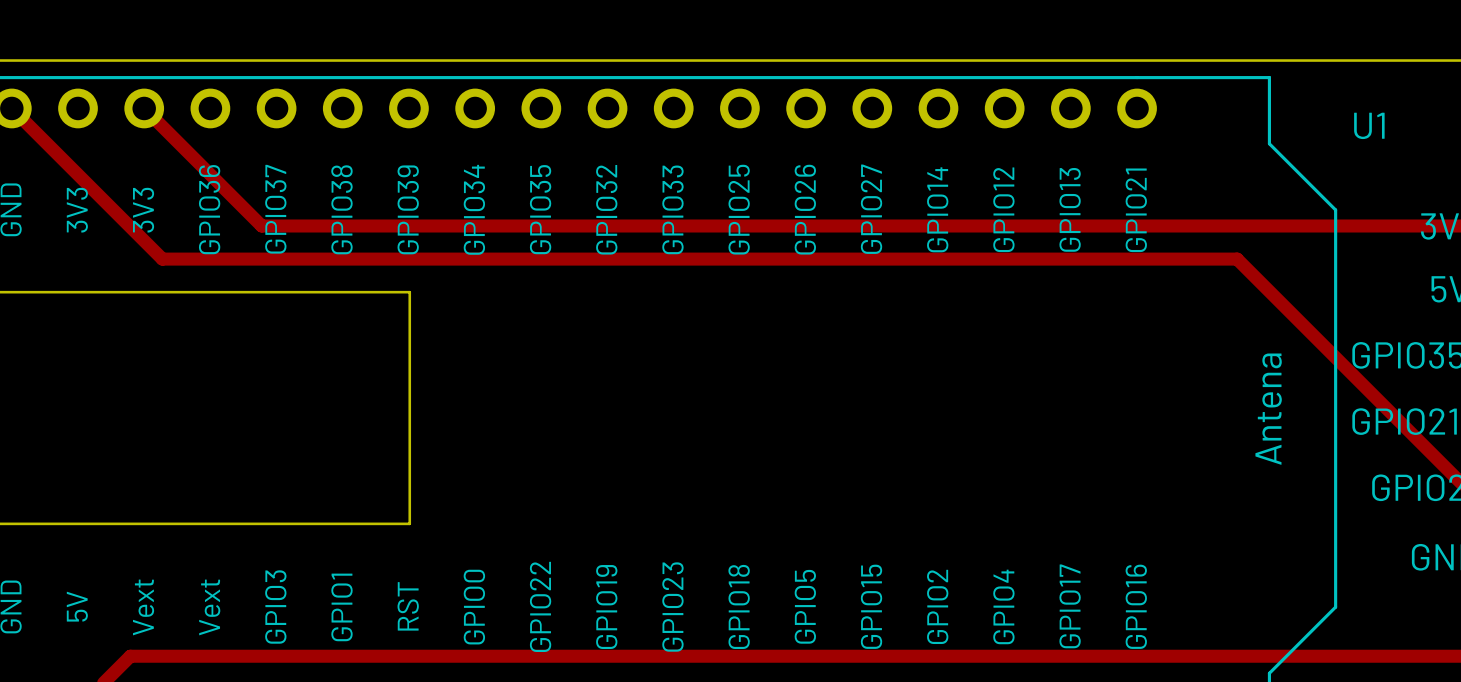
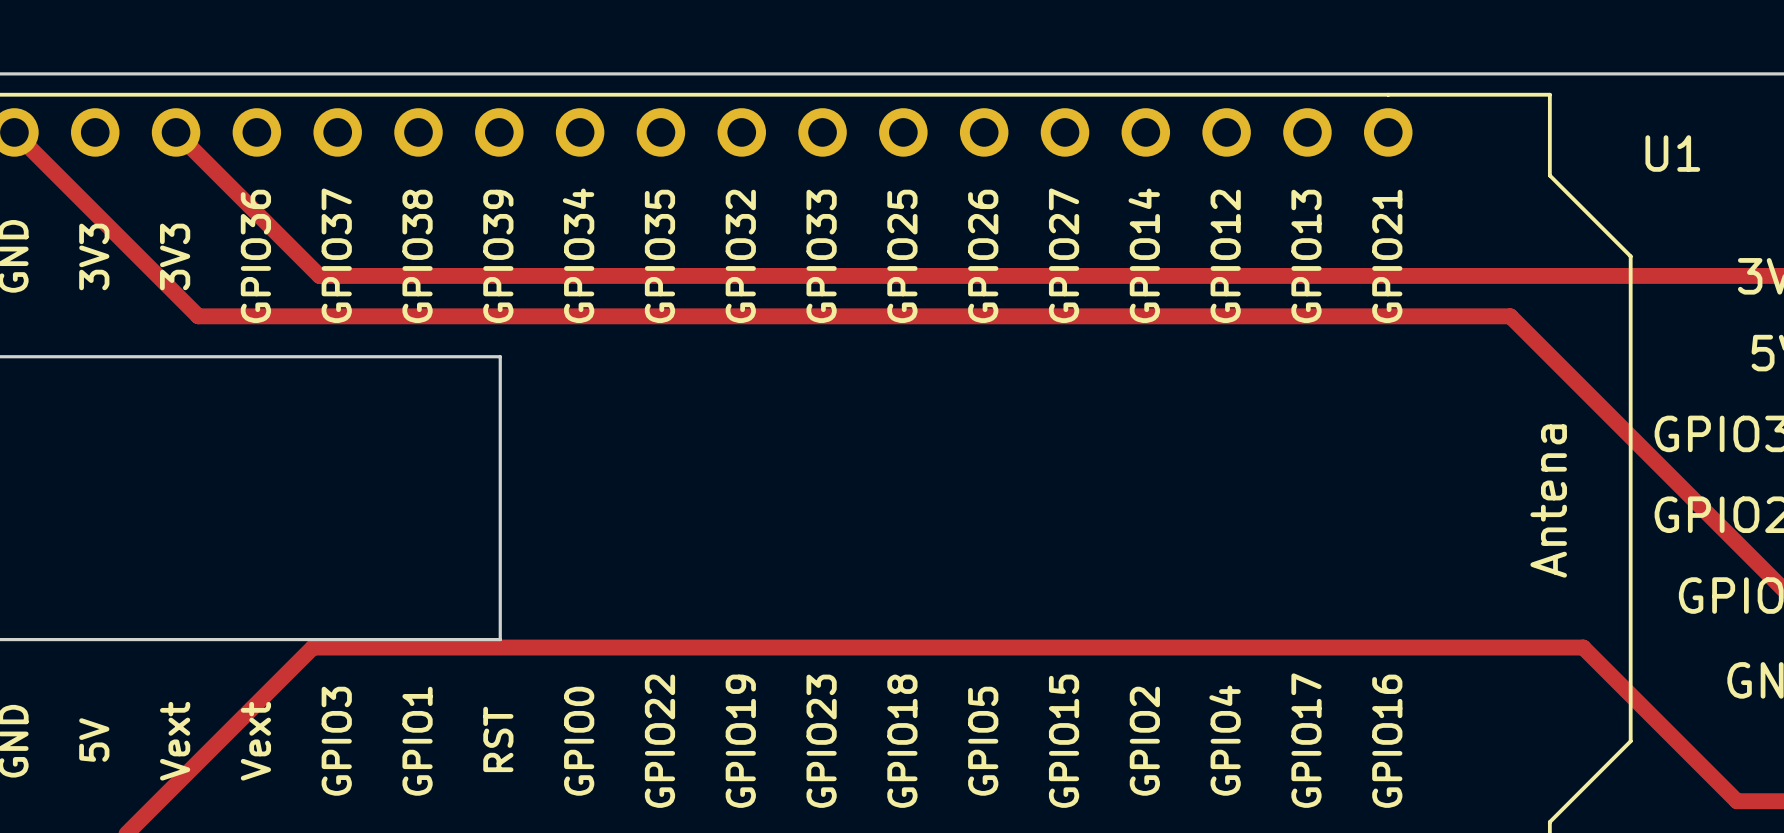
track: (130, 656) (1422, 656) -> (159, 801) (312, 647) (1583, 647) (1736, 801)

